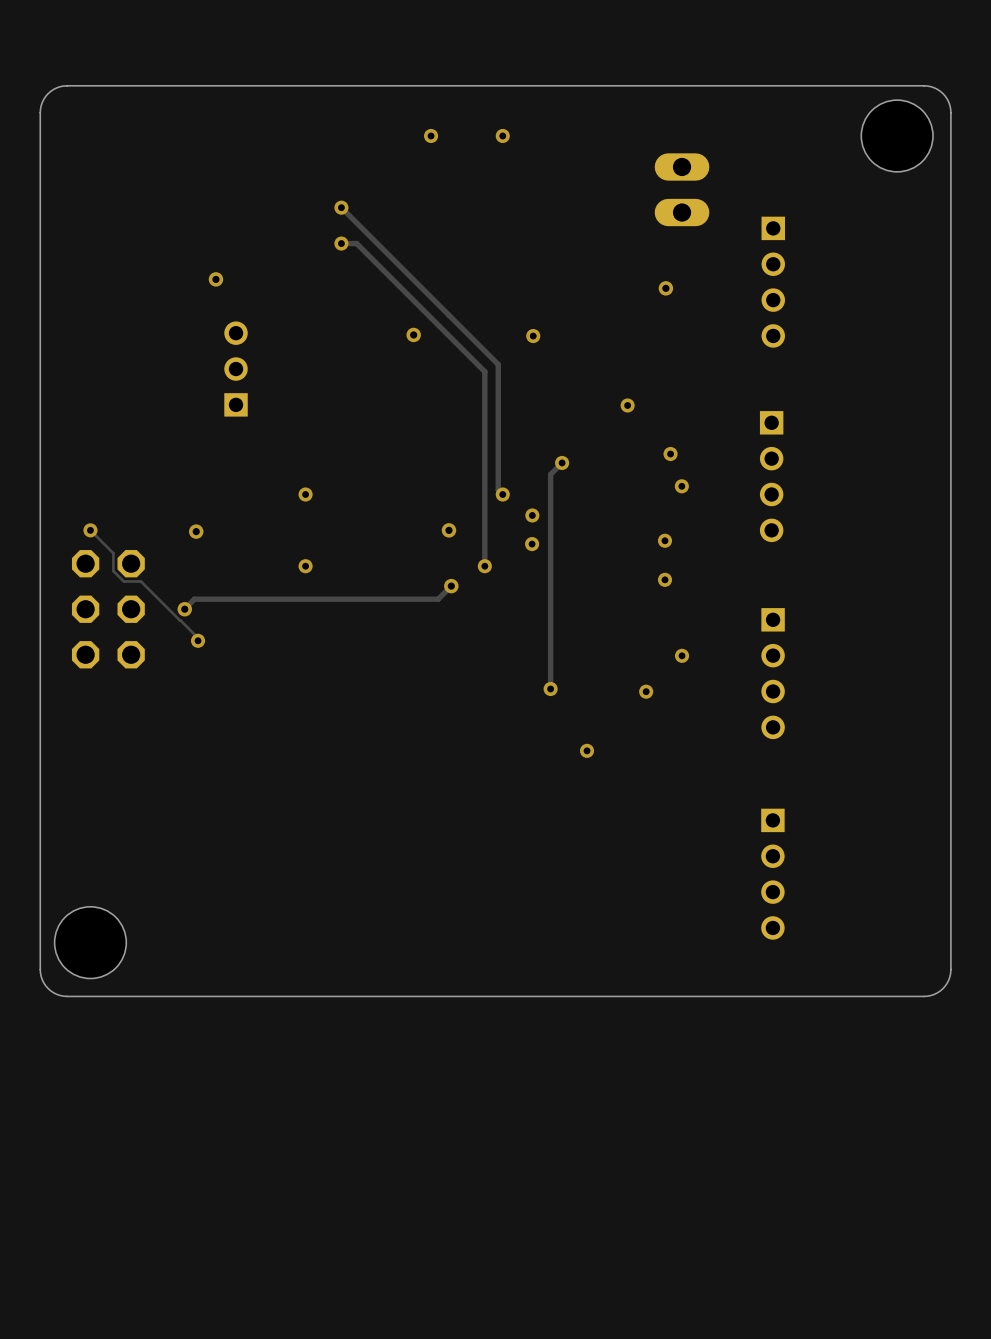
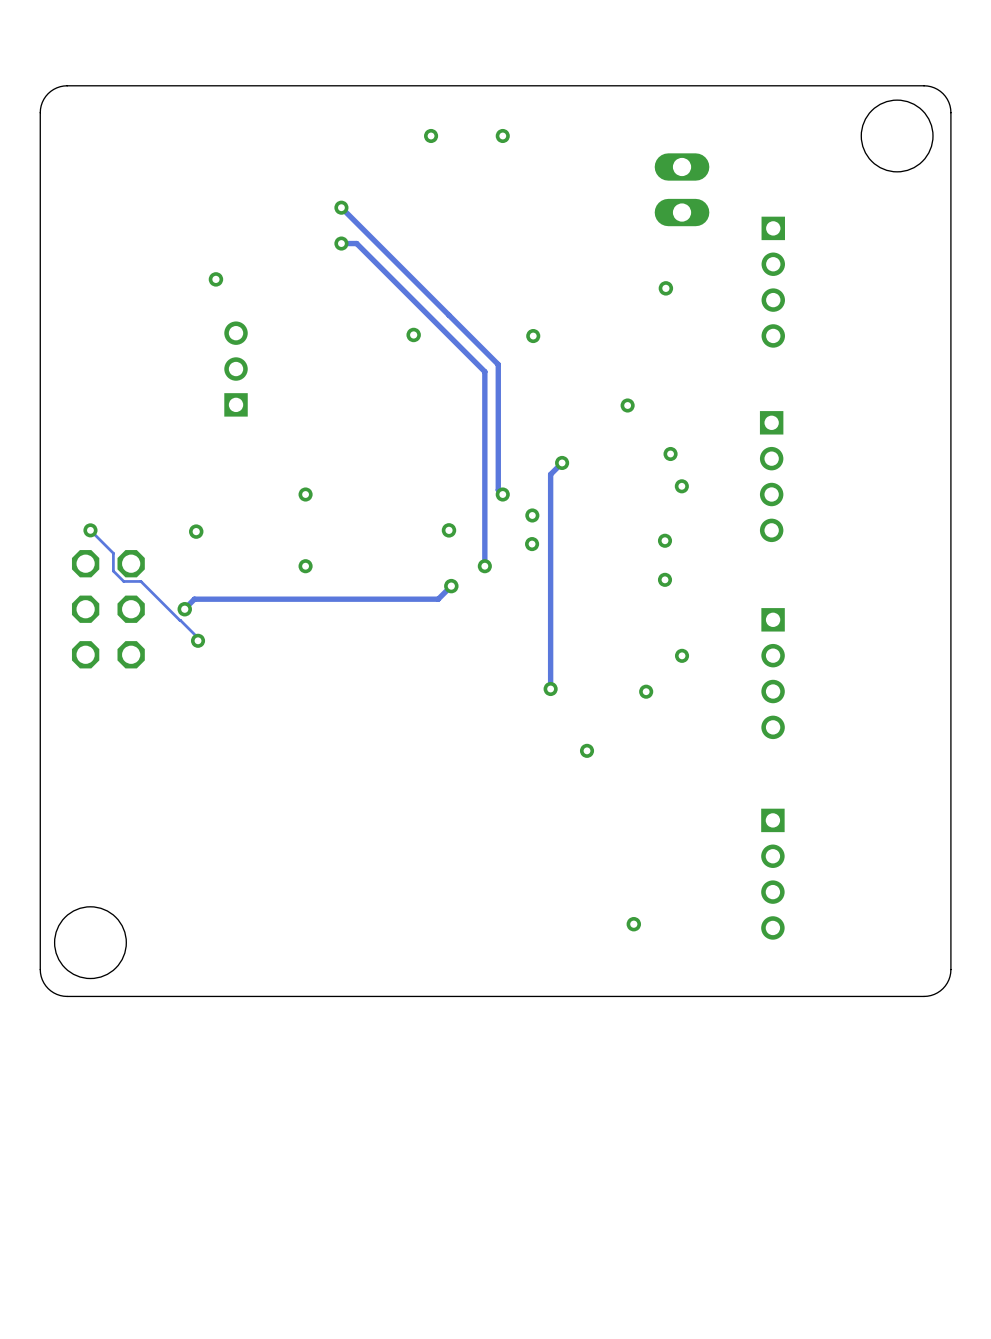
via: none -> (633, 924)

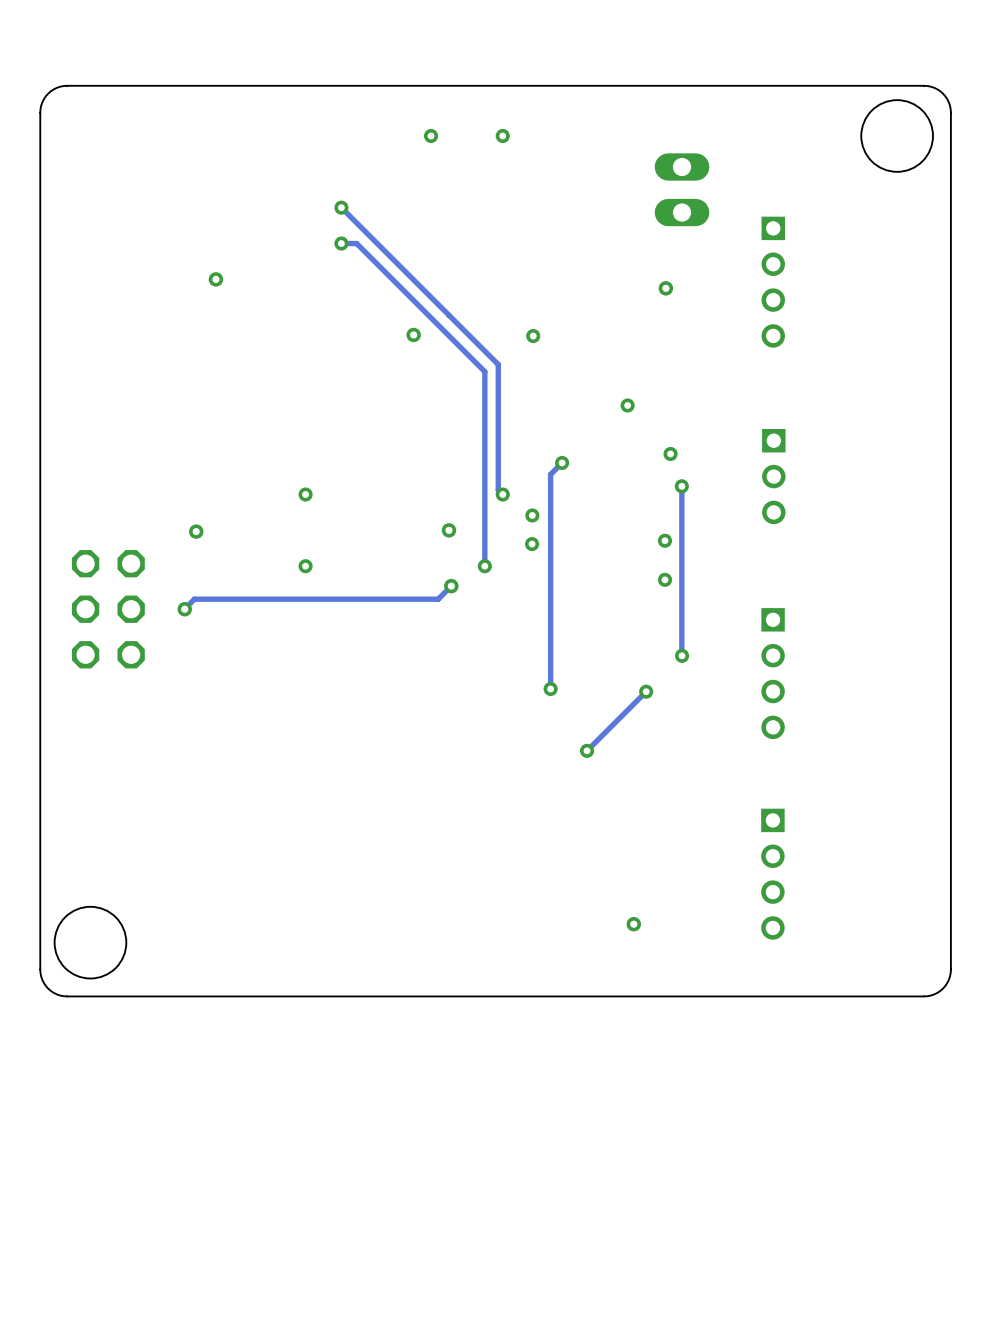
part: (236, 369) -> none
part footprint: [759, 411, 784, 543] -> [762, 429, 786, 525]
track: none -> (681, 486) (681, 655)
track: (90, 530) (113, 553) (113, 571) (123, 581) (140, 581) (198, 637) (198, 640) -> none
via: (90, 530) -> none
via: (198, 640) -> none
track: none -> (646, 691) (587, 750)

